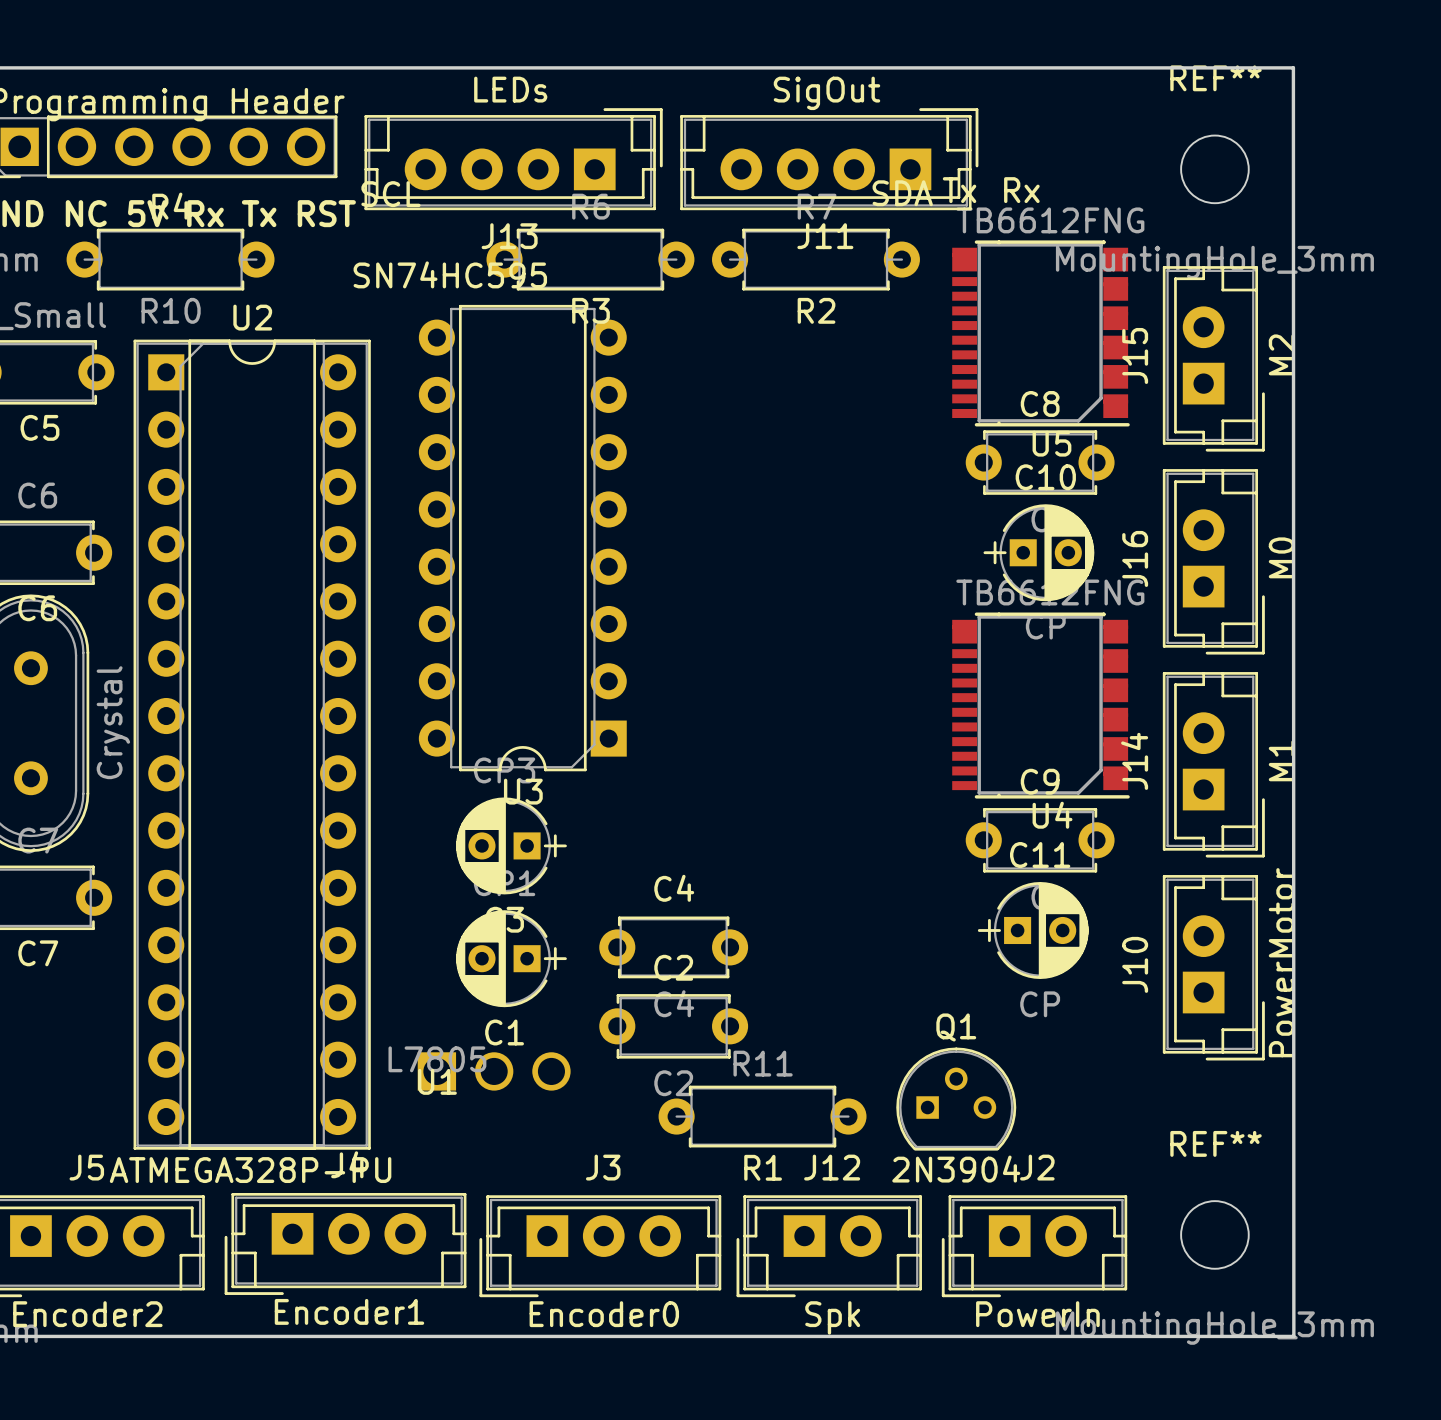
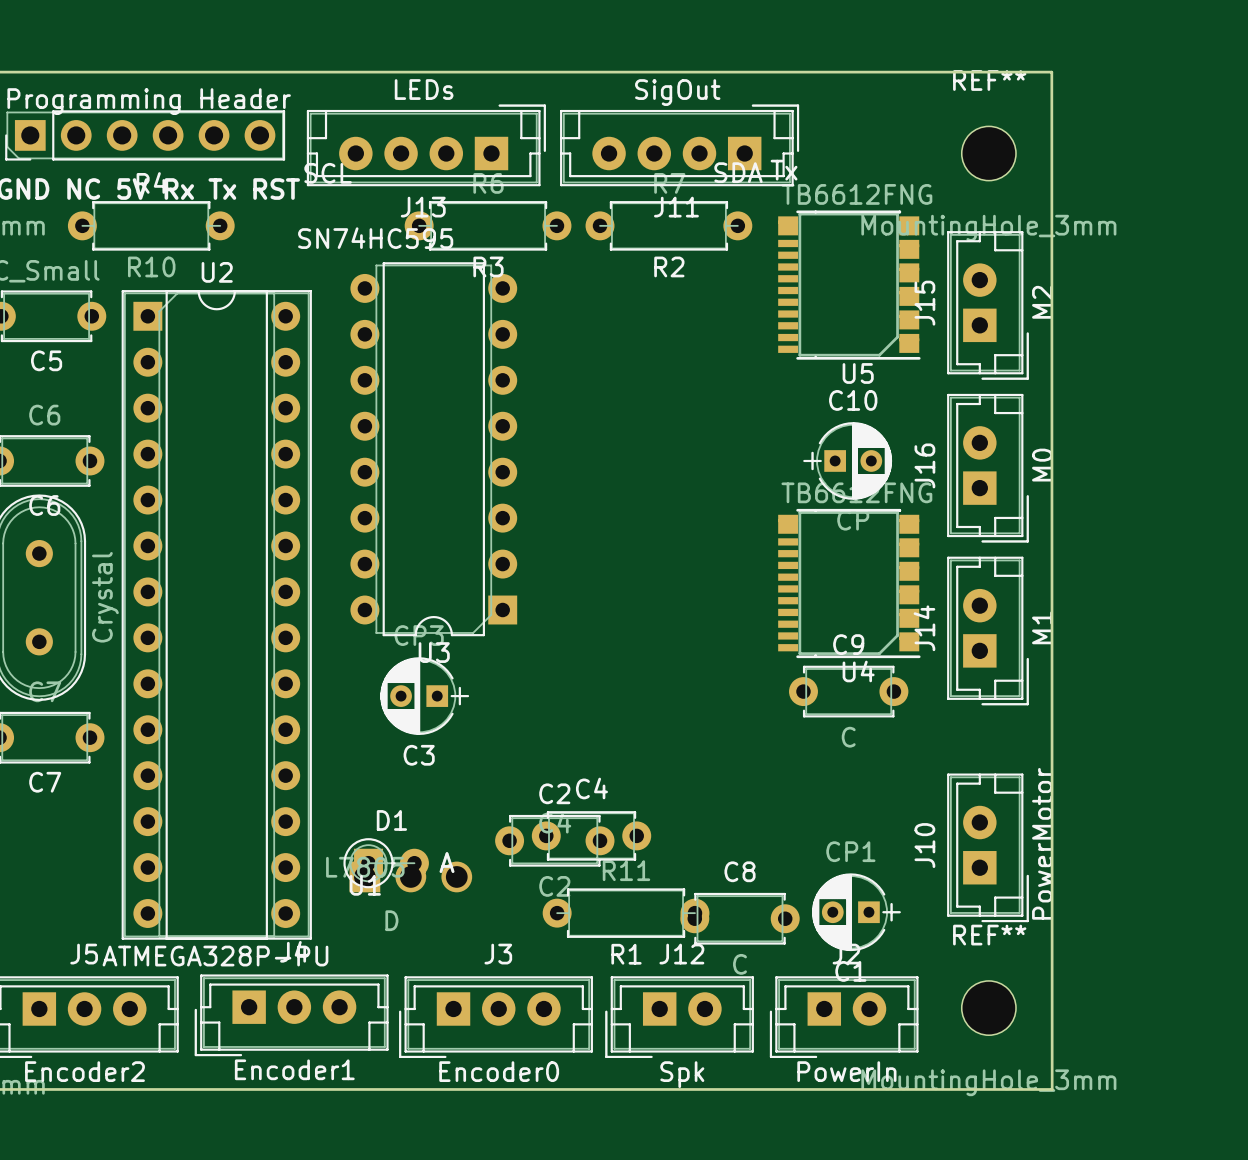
text: Rx (1021, 190) -> none
C8 position: (1040, 462) -> (740, 918)
C11: CP (1033, 930) -> none
C4 position: (673, 947) -> (591, 835)
C1 position: (511, 958) -> (856, 912)
J10 position: (1213, 967) -> (987, 847)
D1: none -> D (386, 863)
Q1: 2N3904 (956, 1099) -> none

